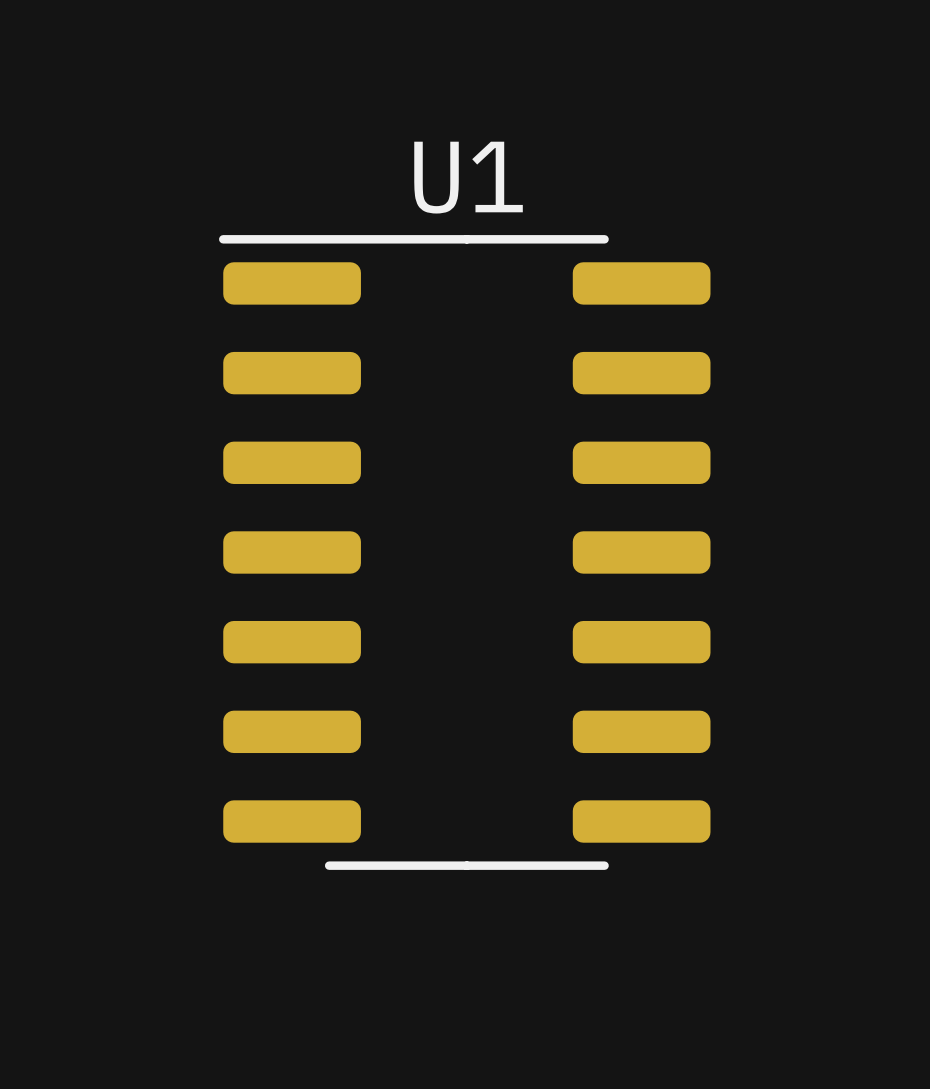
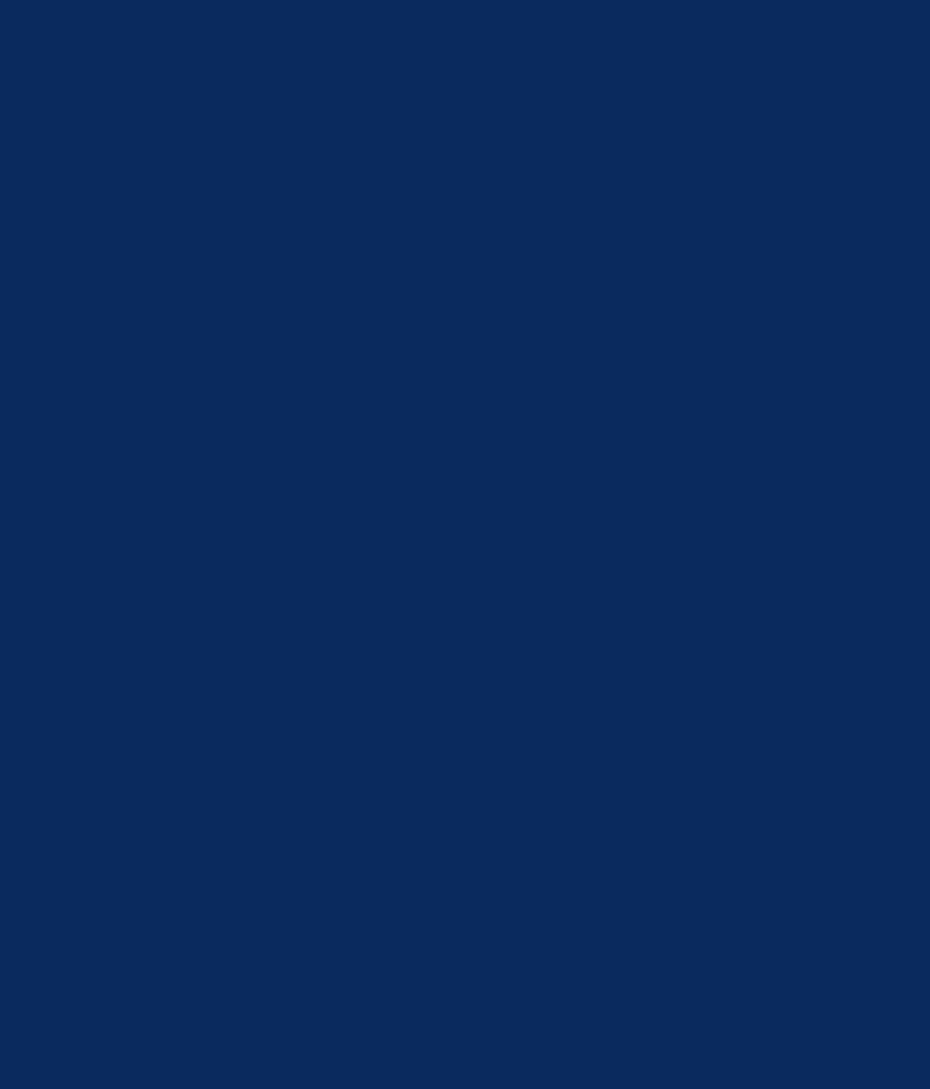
U1: (464, 552) -> none

